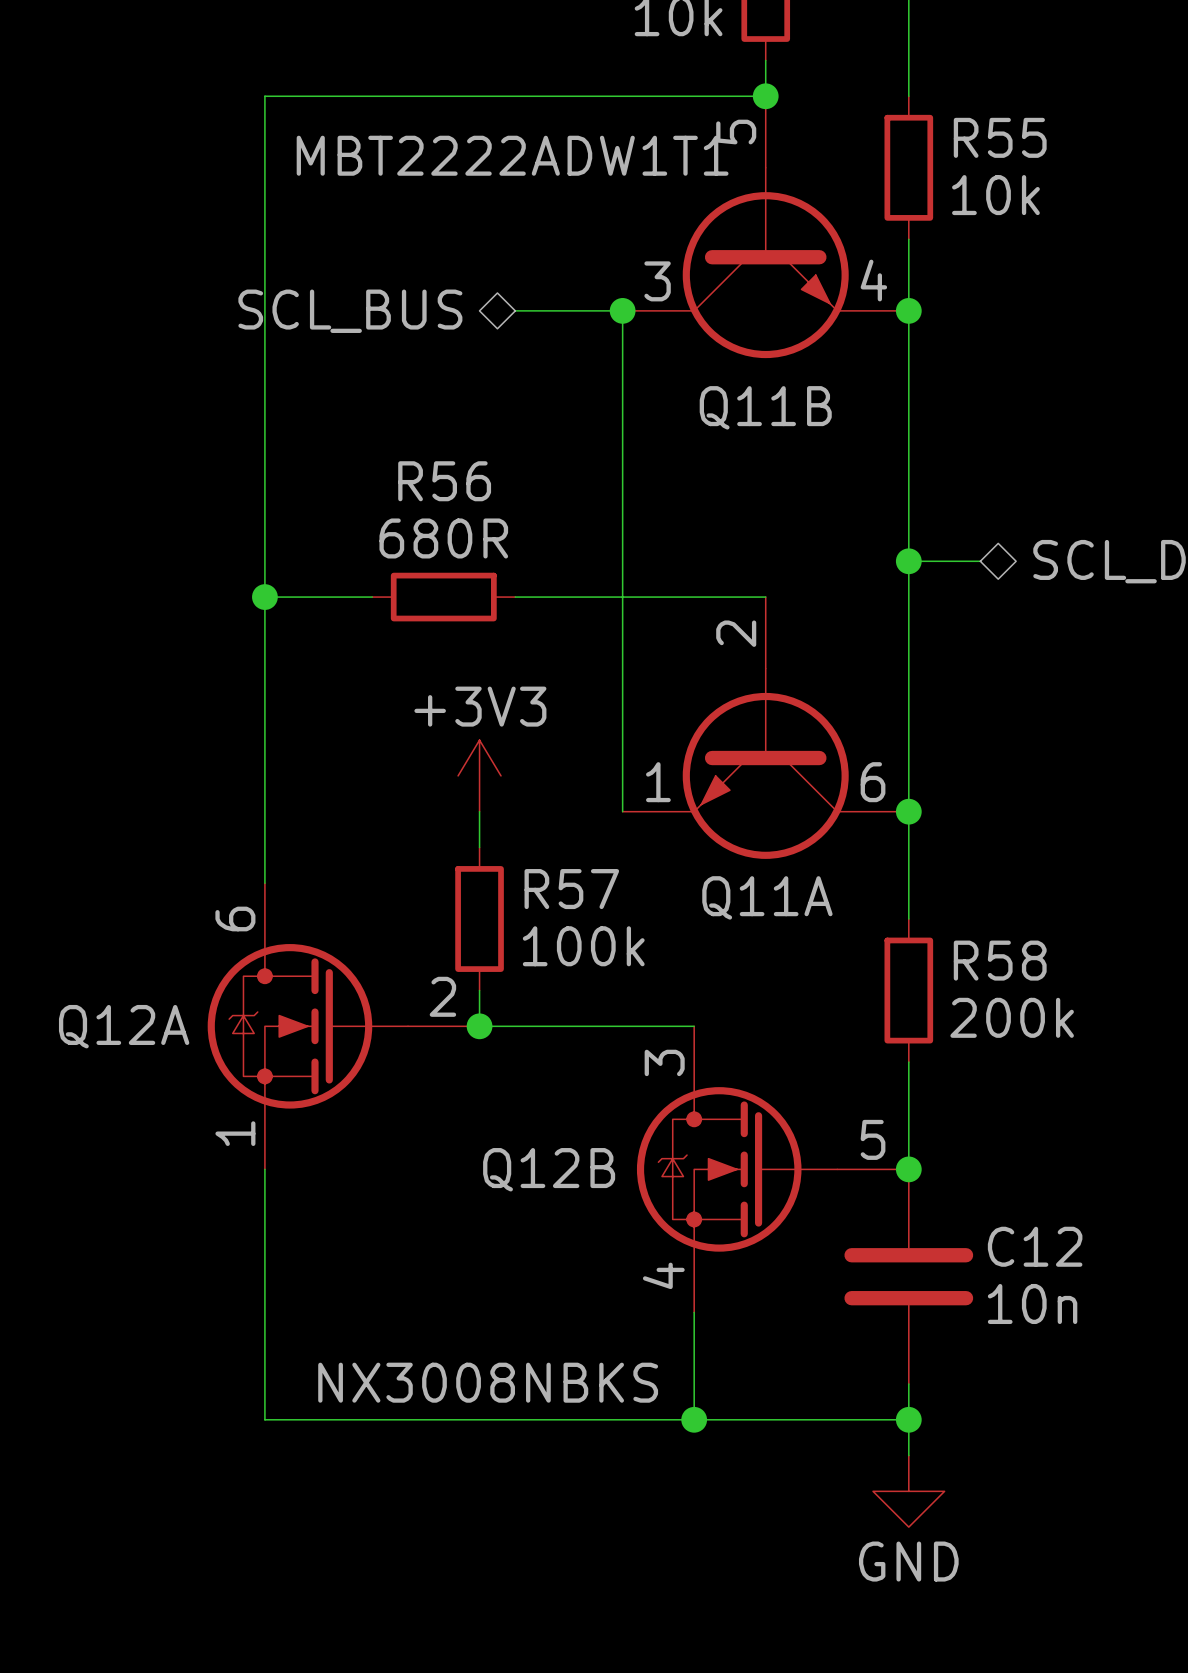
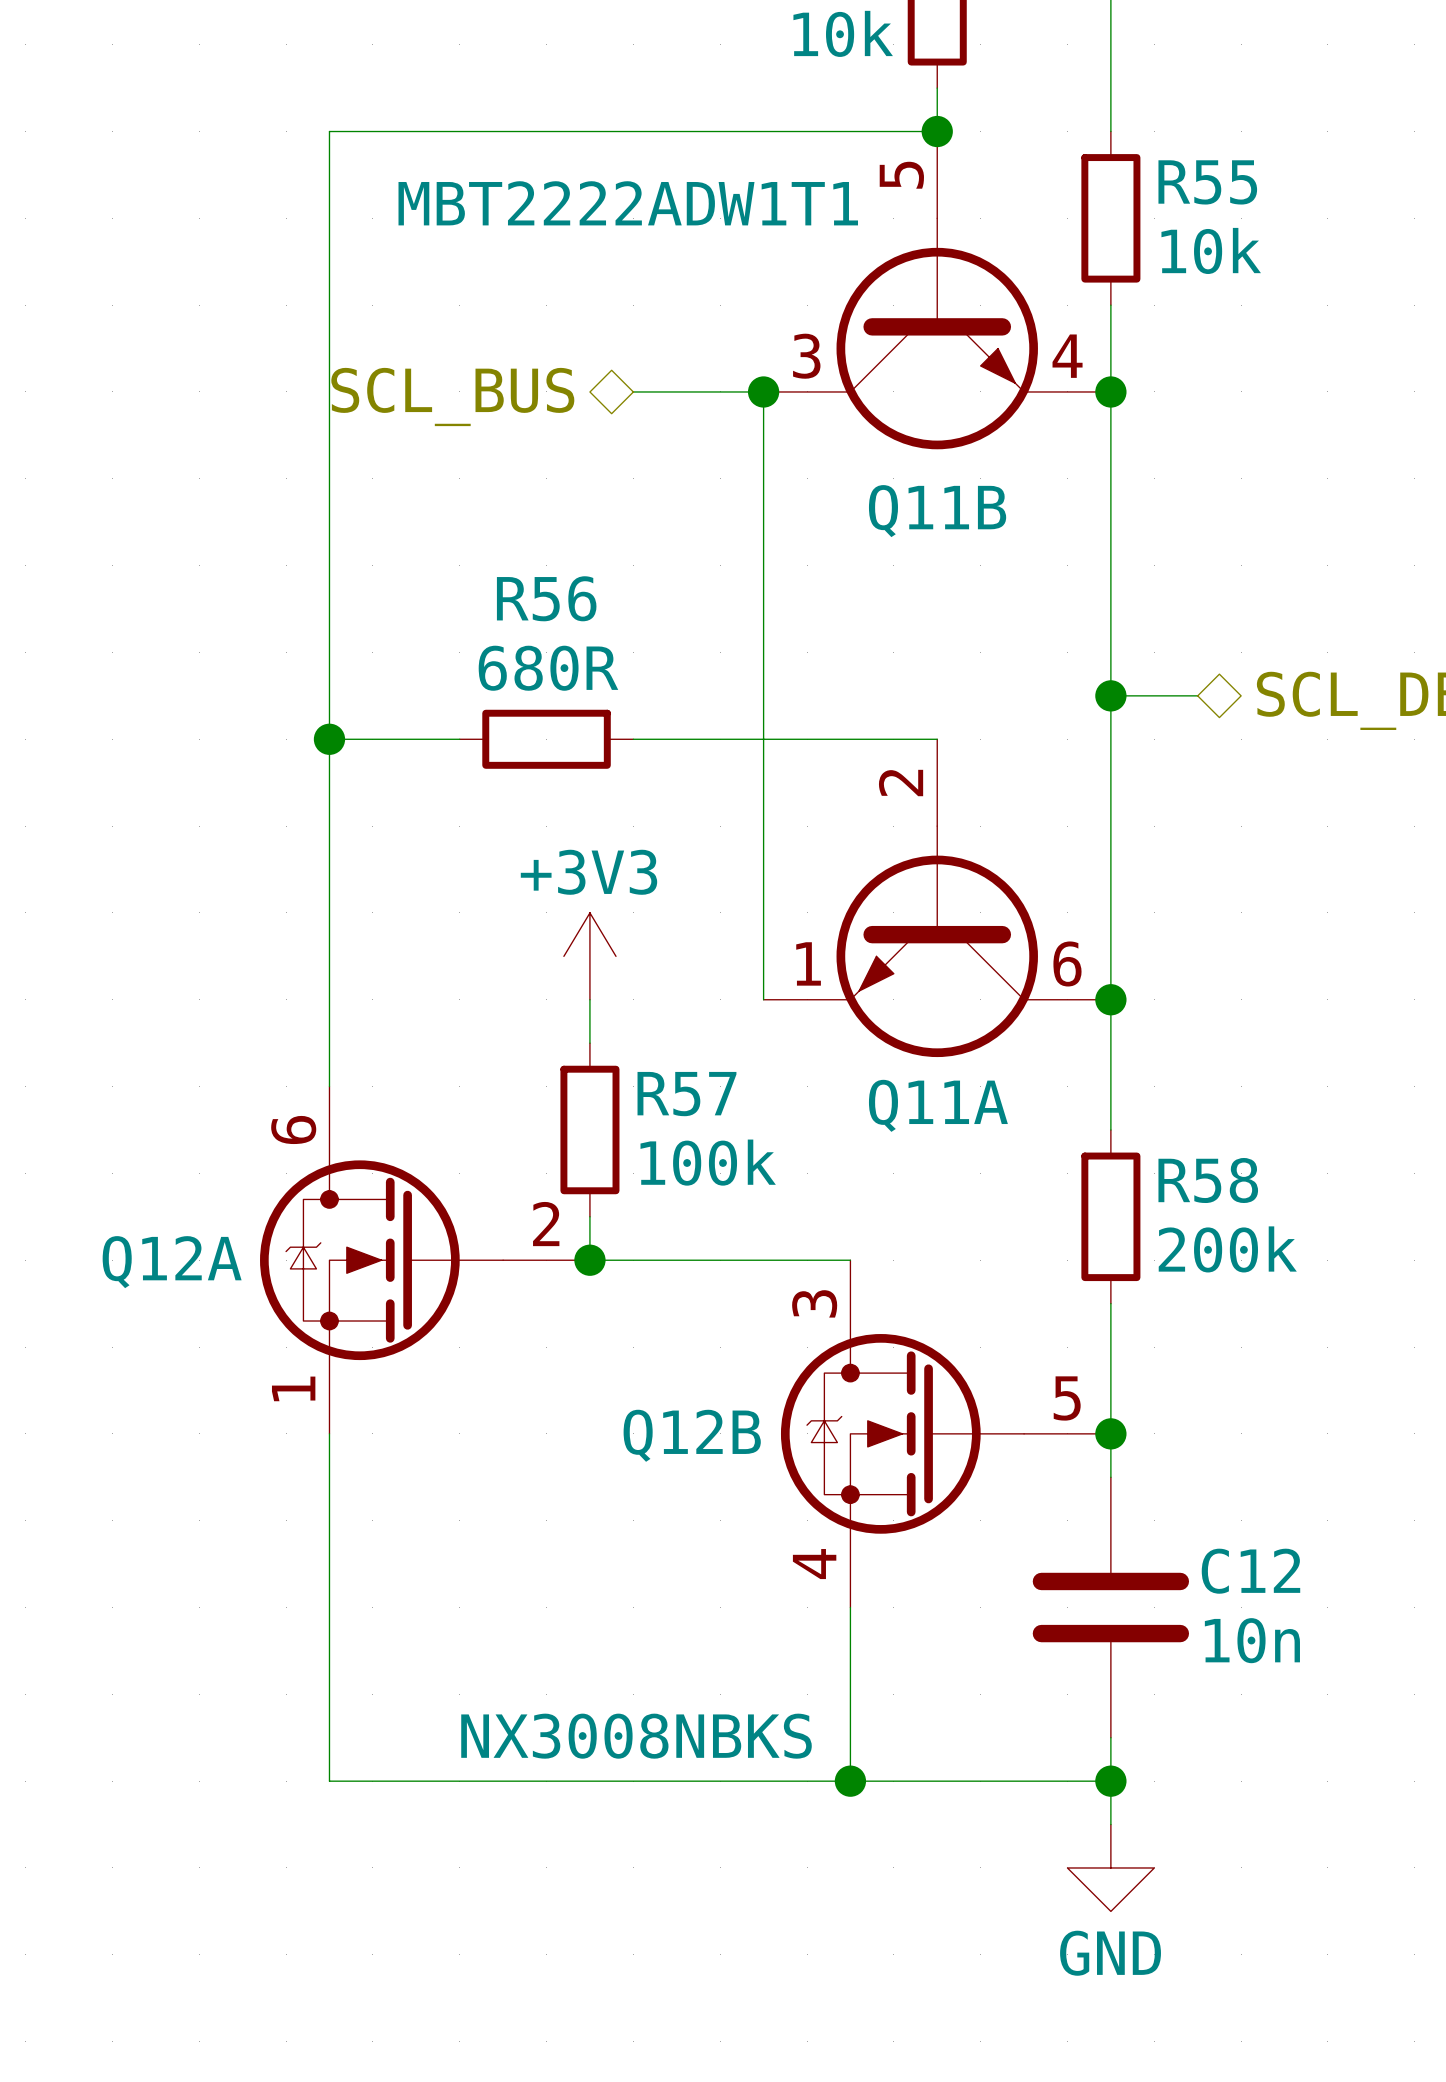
C12 position: (908, 1276) -> (1110, 1607)
Q12A value position: NX3008NBKS (488, 1382) -> NX3008NBKS (636, 1736)
wire: (908, 1384) (908, 1419) (264, 1419) -> (1110, 1824) (1110, 1781) (329, 1781) (329, 1737)
wire: none -> (850, 1737) (850, 1781)
junction position: (694, 1419) -> (850, 1781)
junction position: (908, 1419) -> (1110, 1781)
power symbol position: GND (908, 1491) -> GND (1110, 1867)

